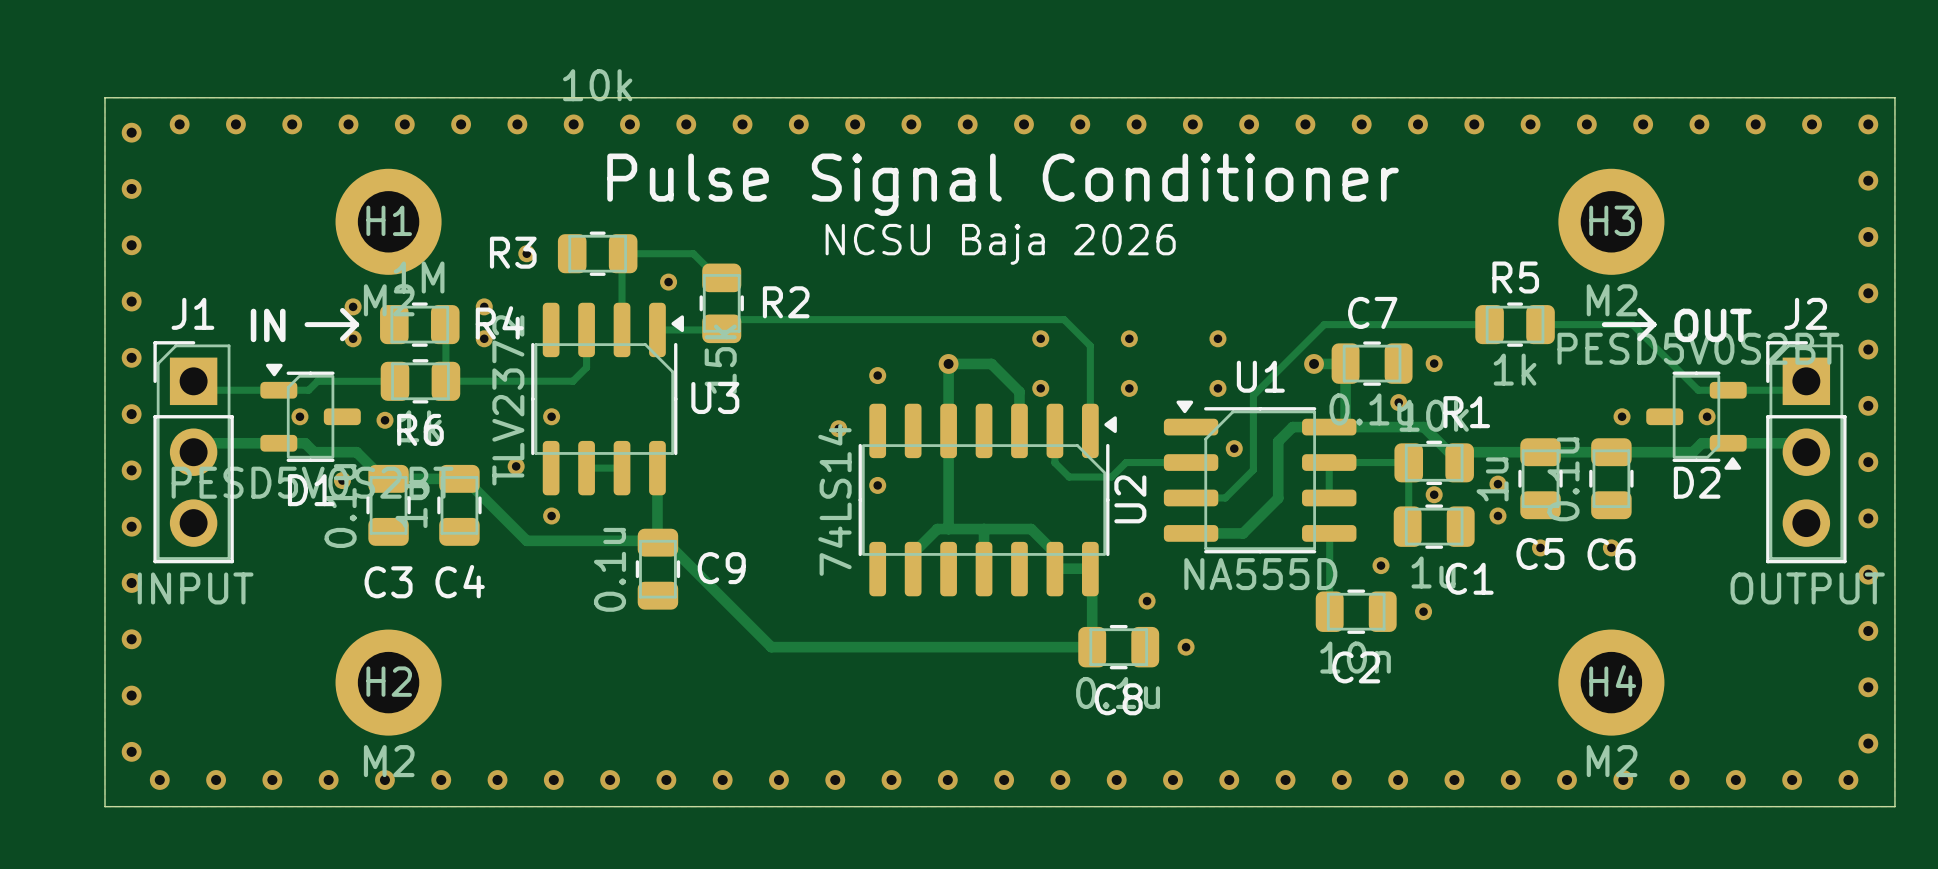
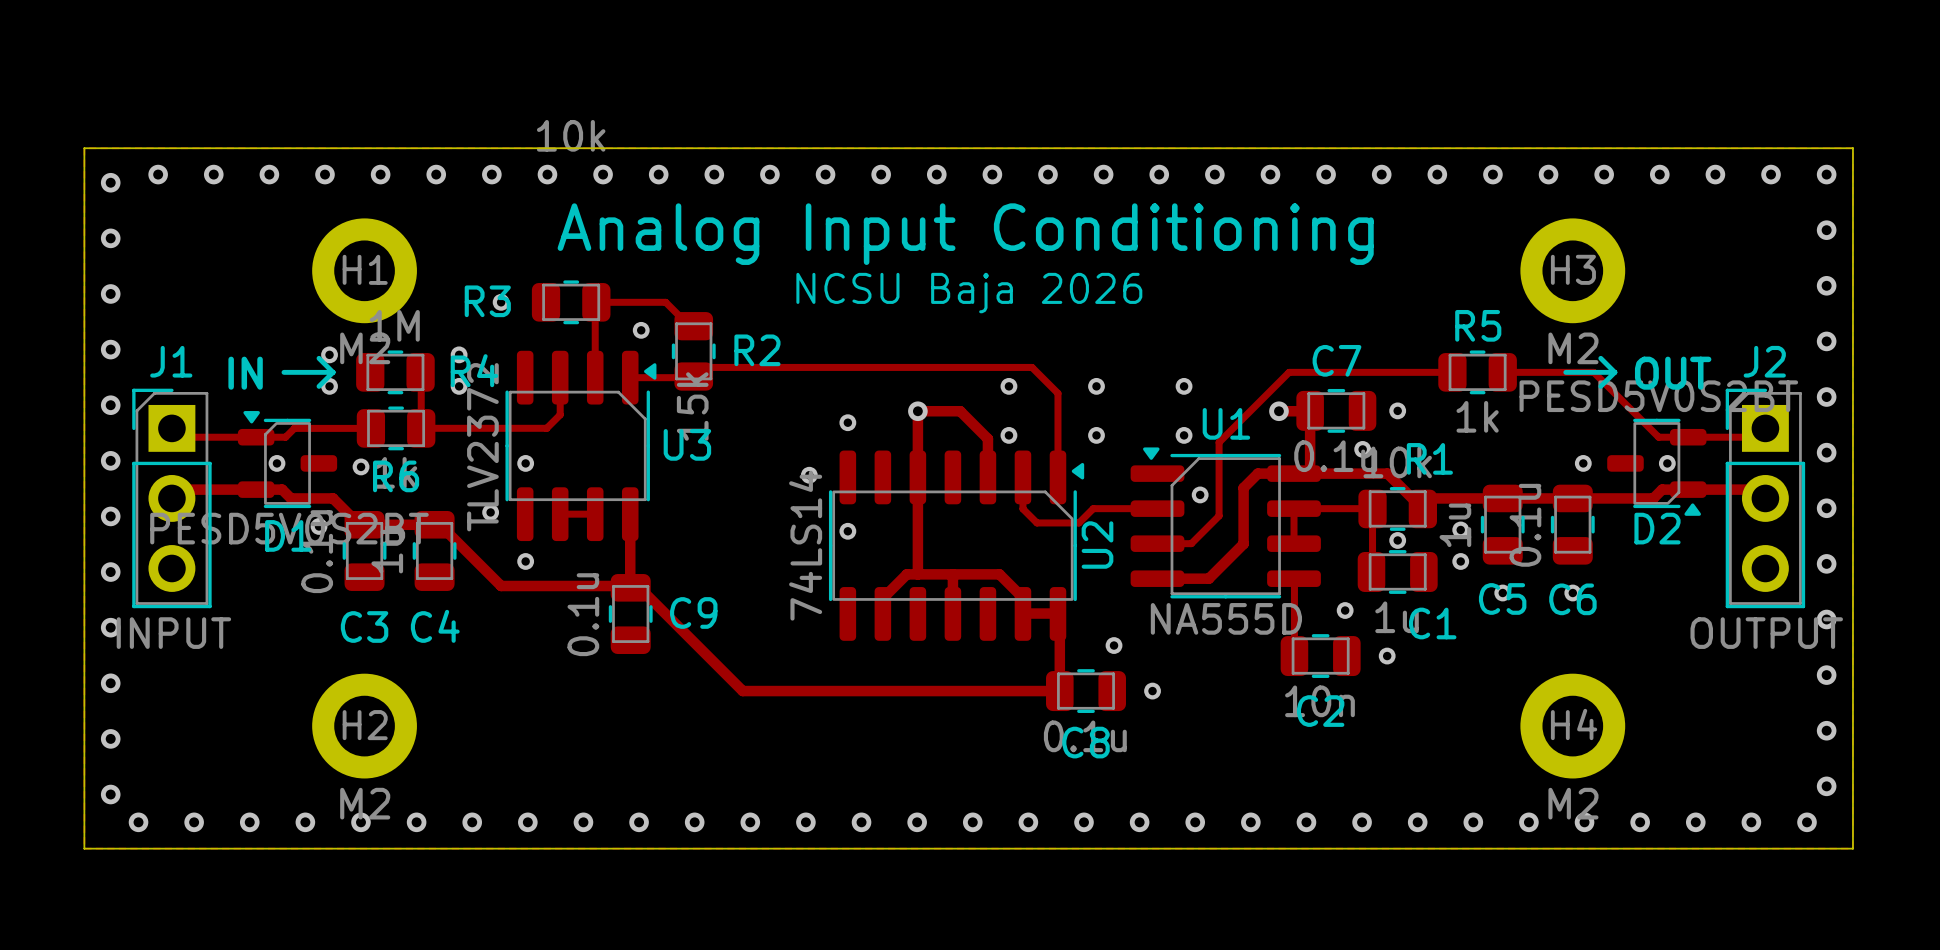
text: Pulse Signal Conditioner (1003, 184) -> Analog Input Conditioning (965, 234)

